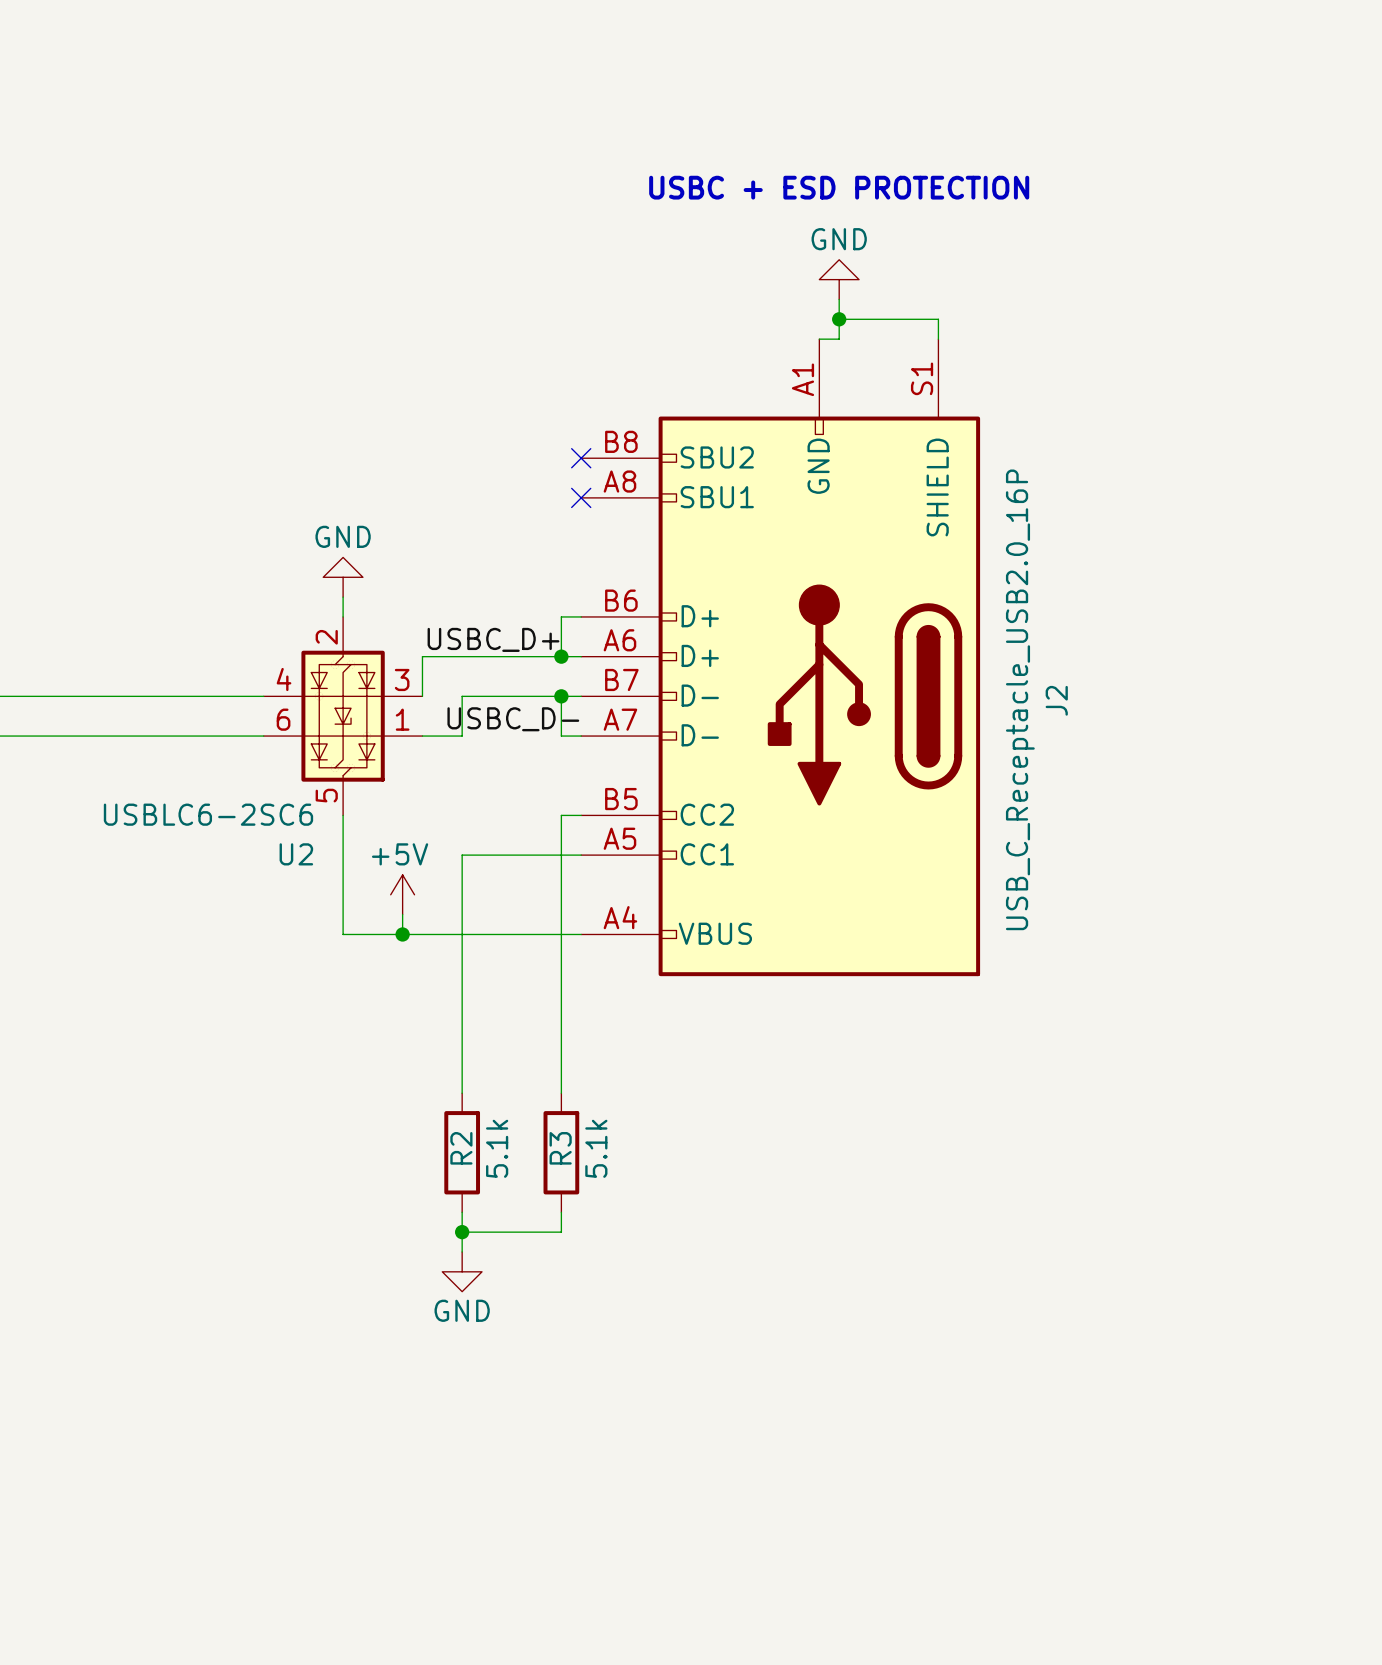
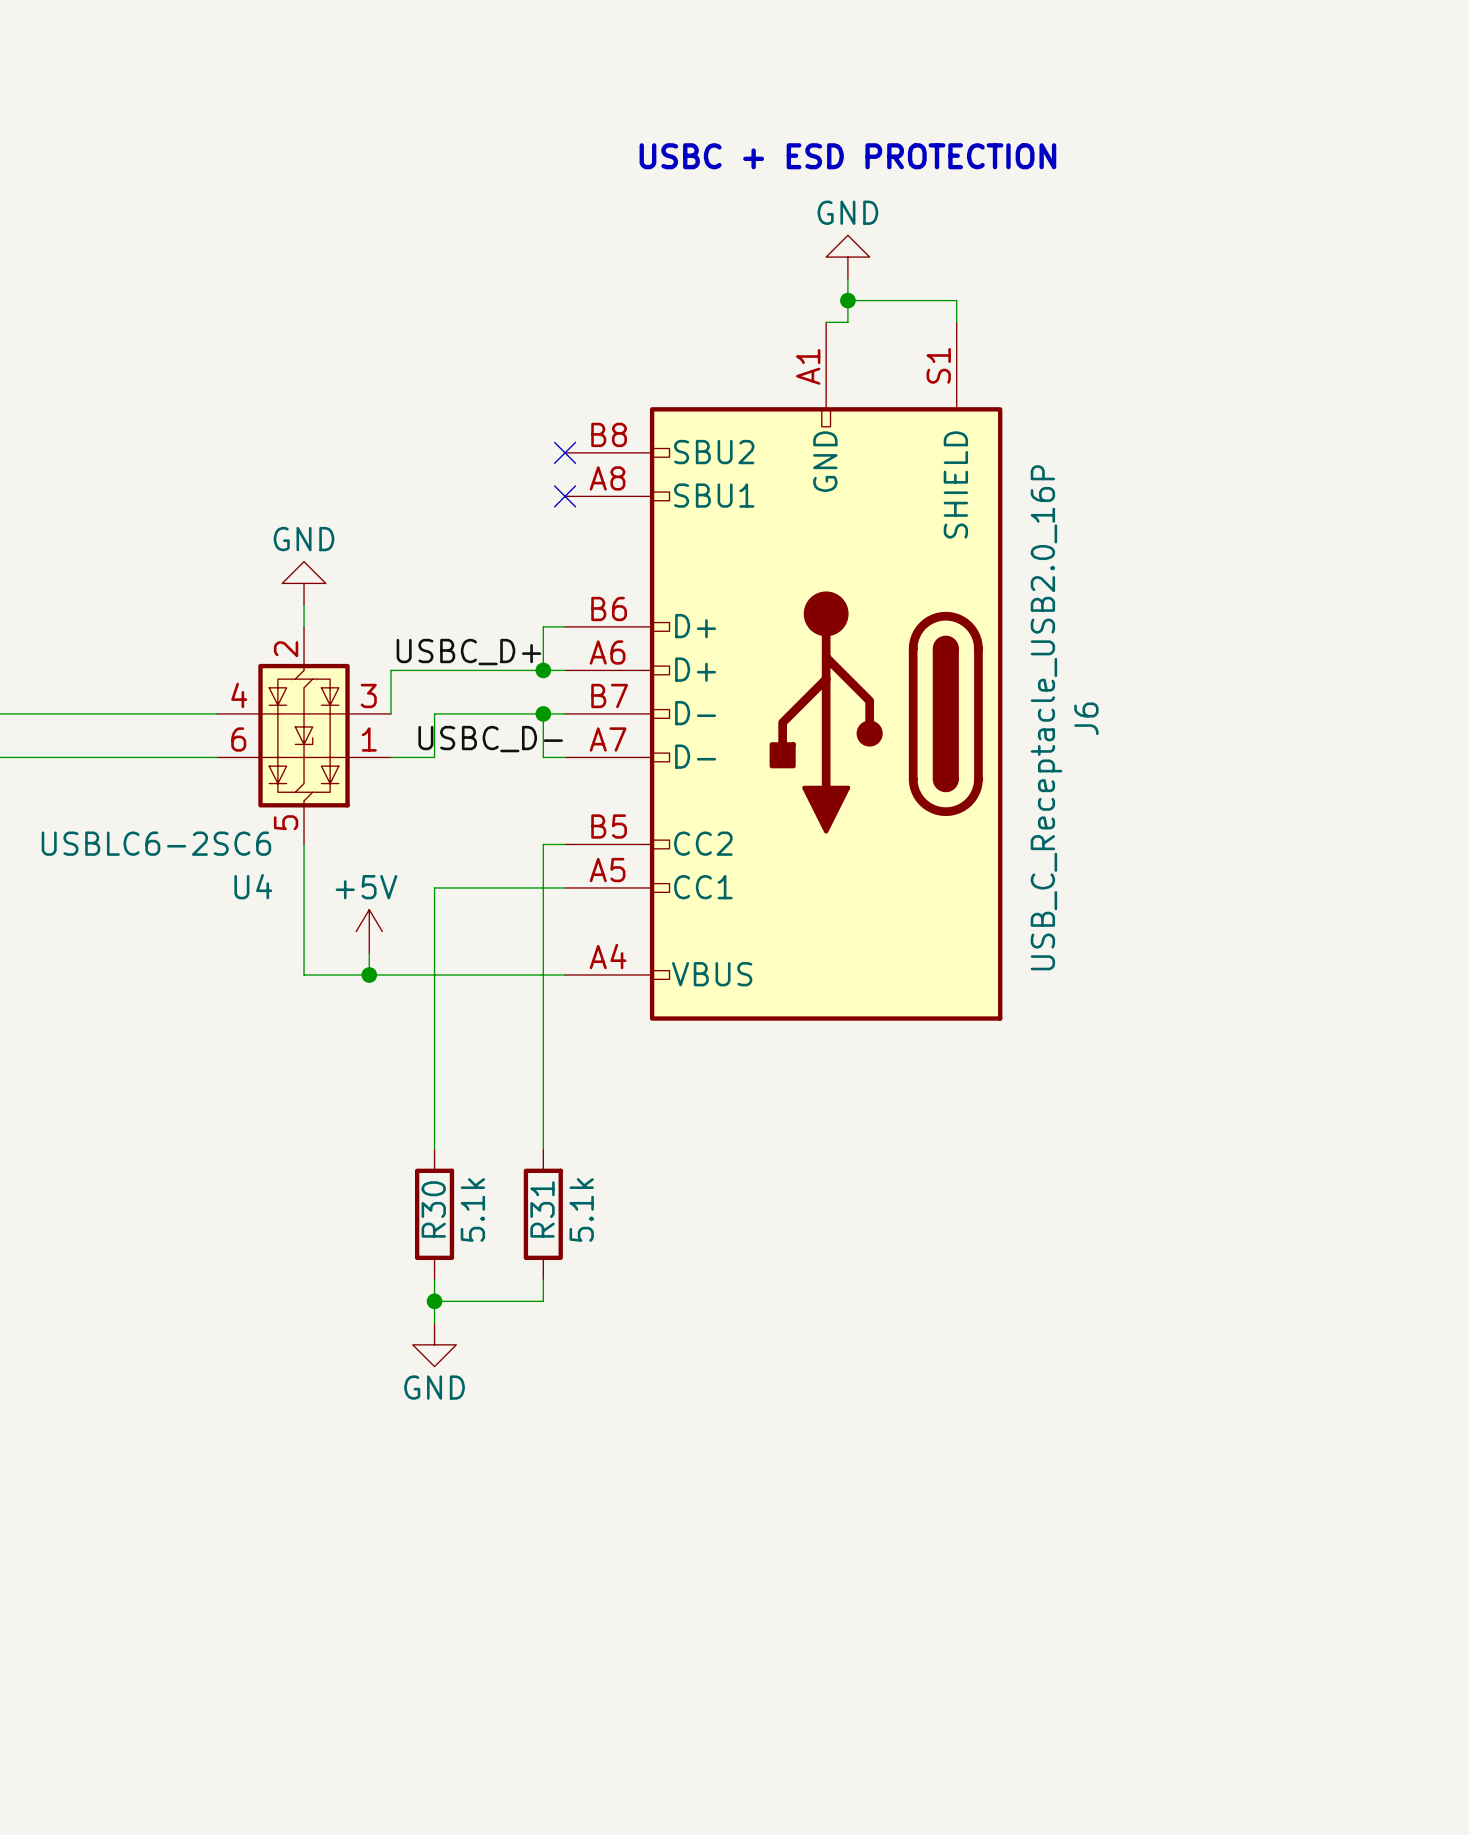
J2 name: J2 (1056, 700) -> J6 (1086, 718)
U2 name: U2 (296, 854) -> U4 (253, 886)
R2 name: R2 (461, 1148) -> R30 (433, 1209)
R3 name: R3 (560, 1148) -> R31 (542, 1209)

